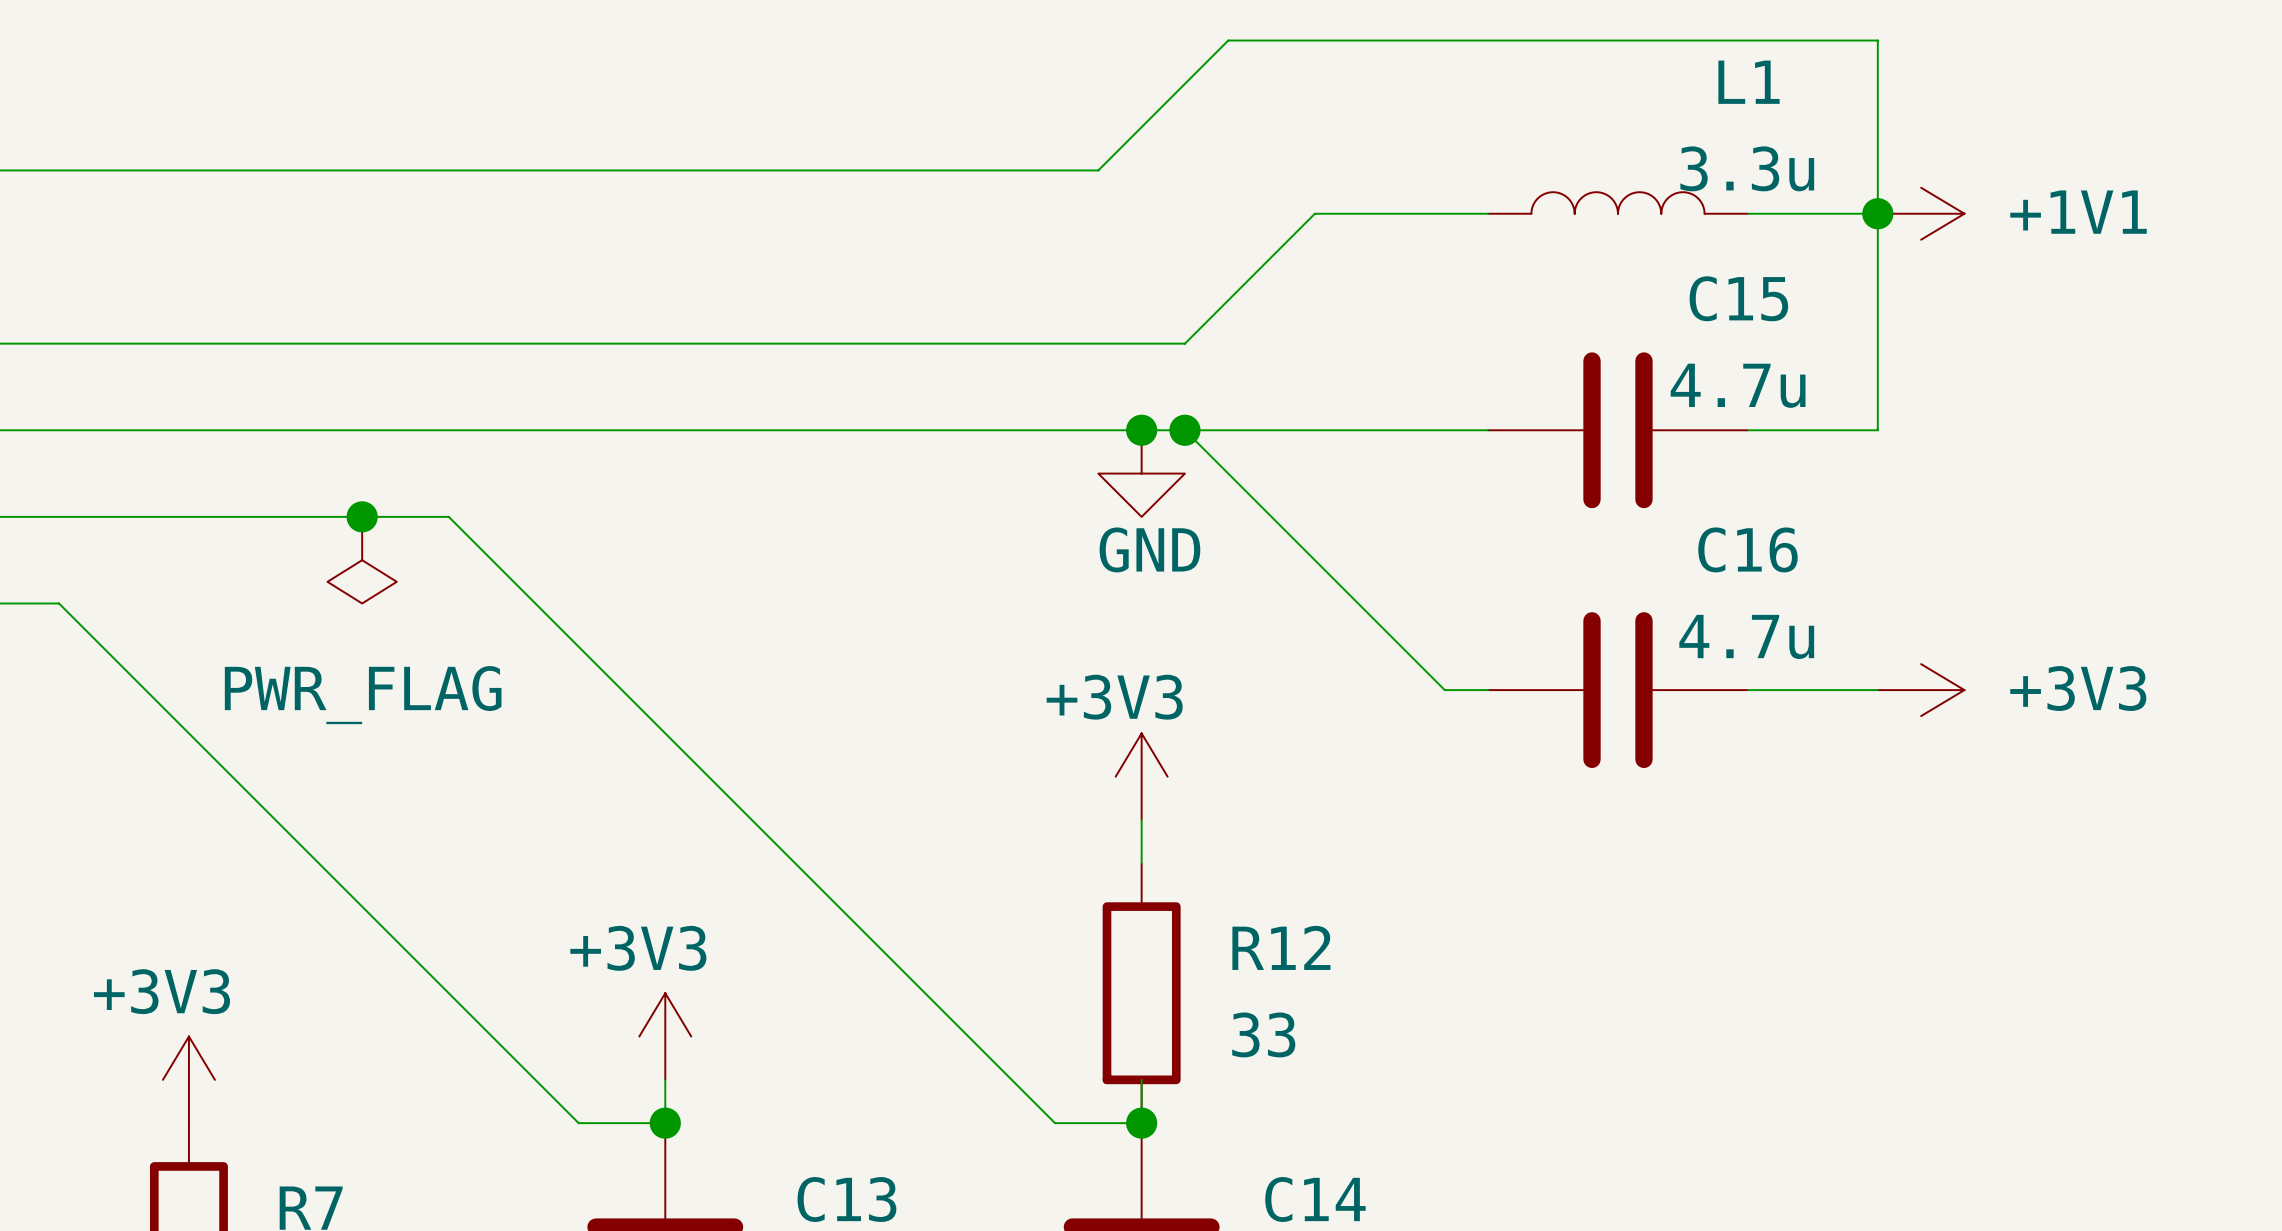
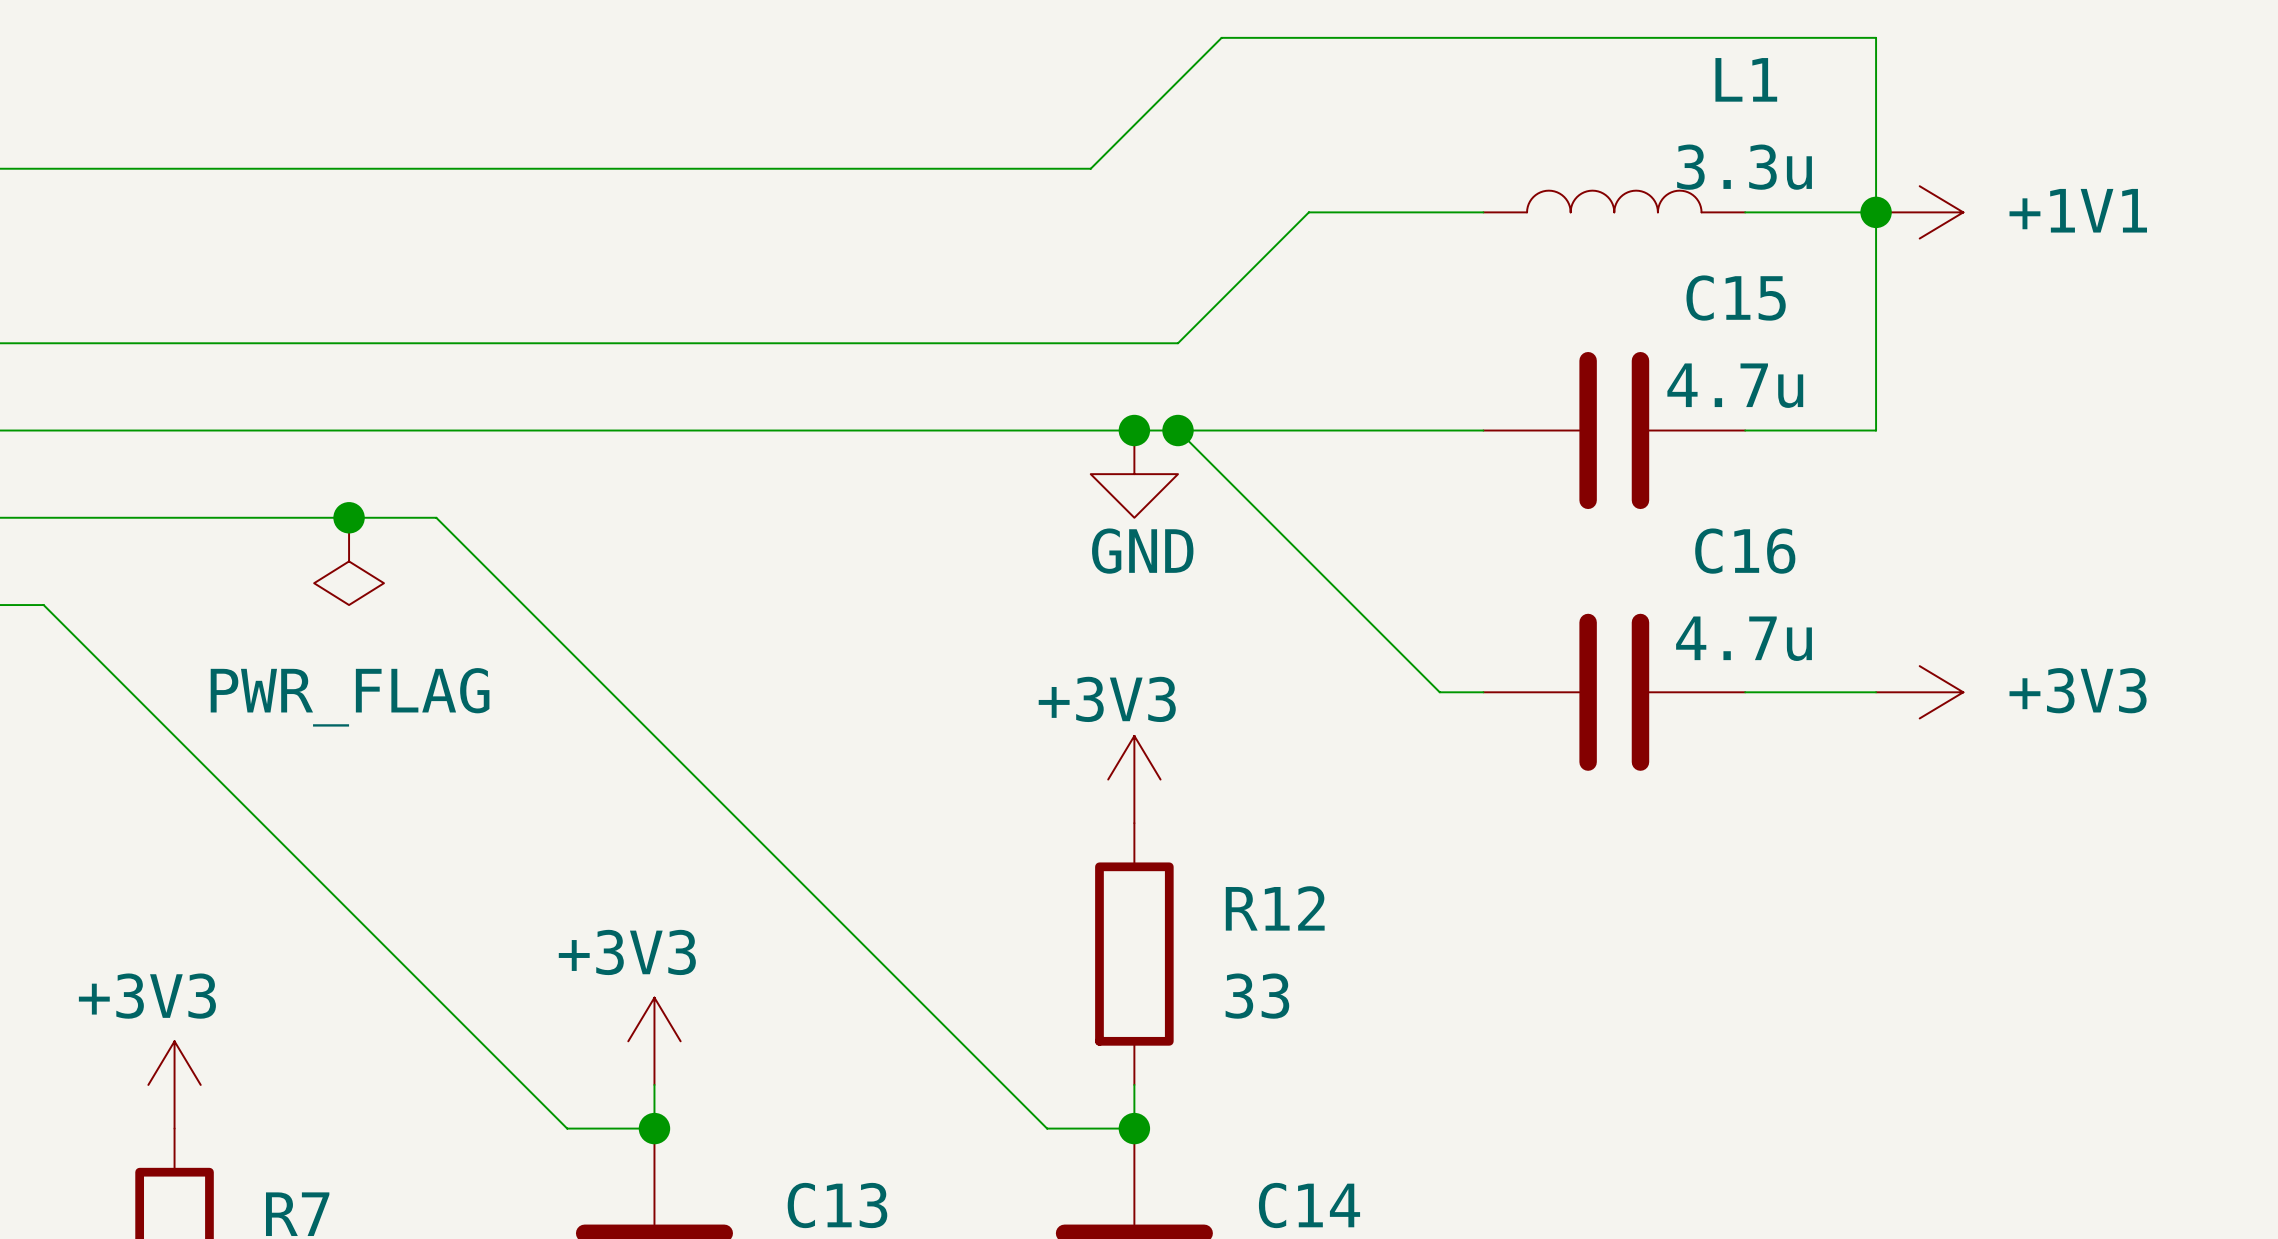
R12 position: (1141, 993) -> (1134, 954)

